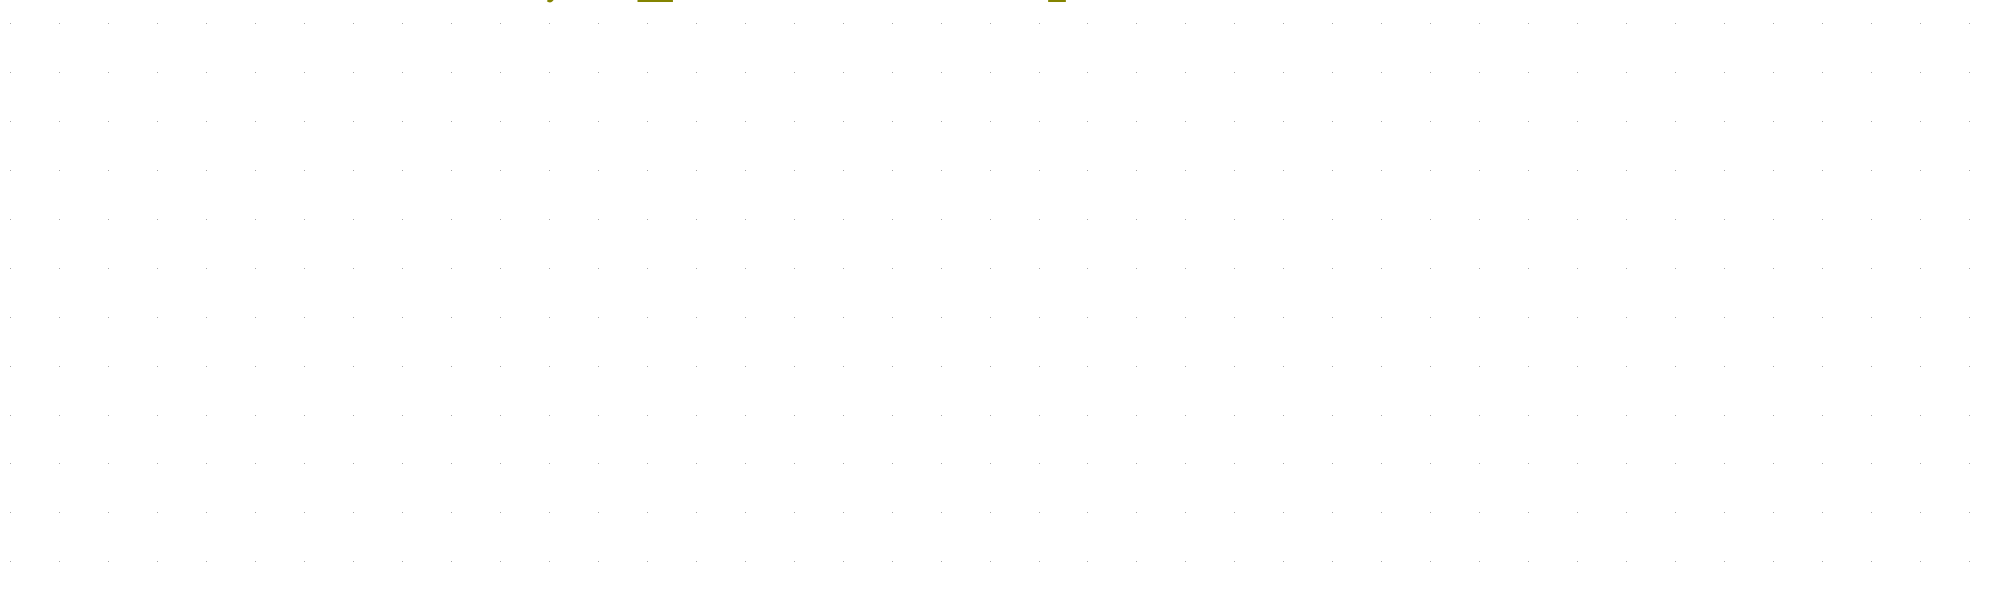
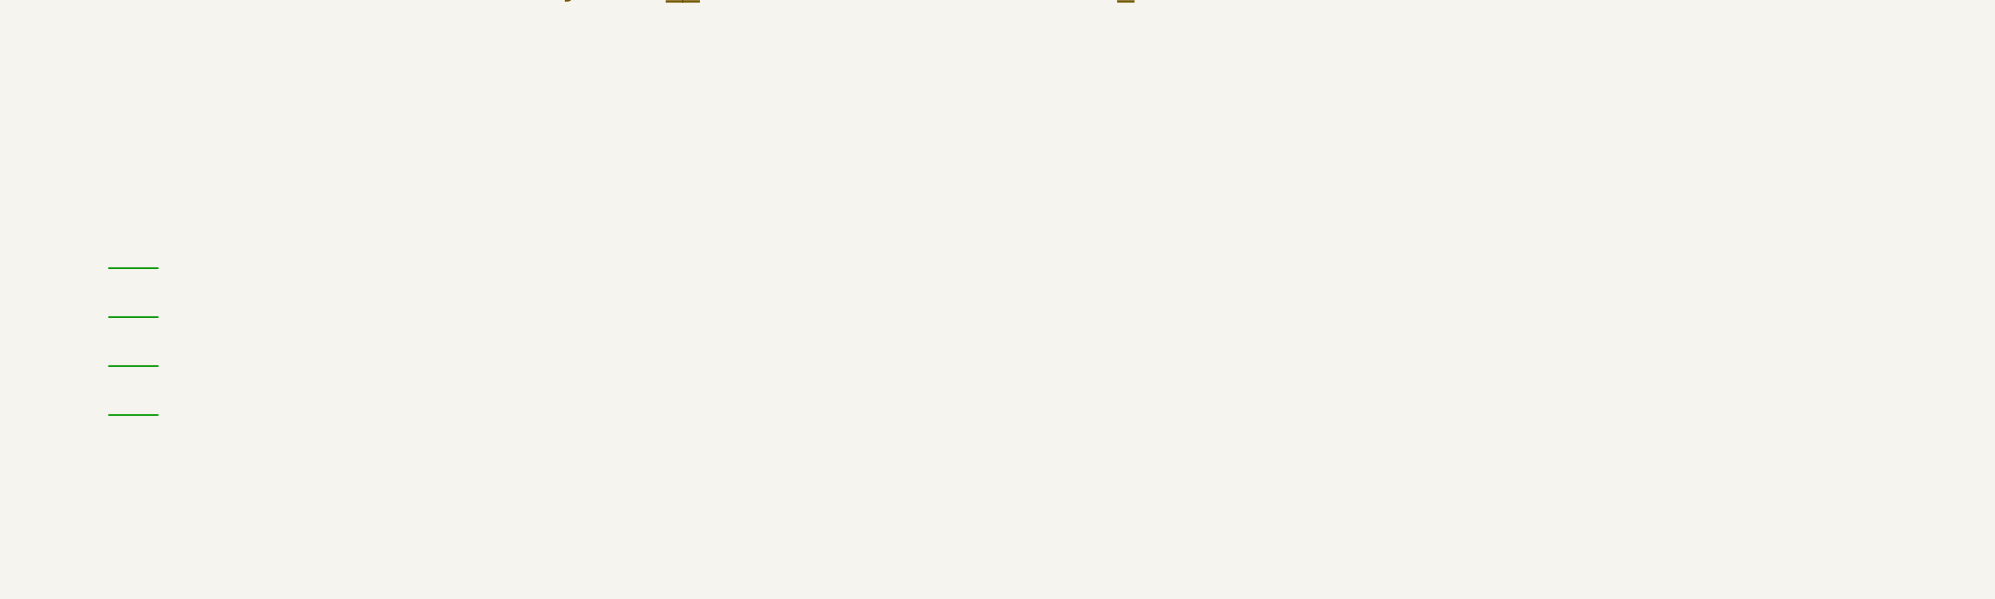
wire: none -> (108, 268) (157, 268)
wire: none -> (108, 317) (157, 317)
wire: none -> (108, 366) (157, 366)
wire: none -> (108, 415) (157, 415)

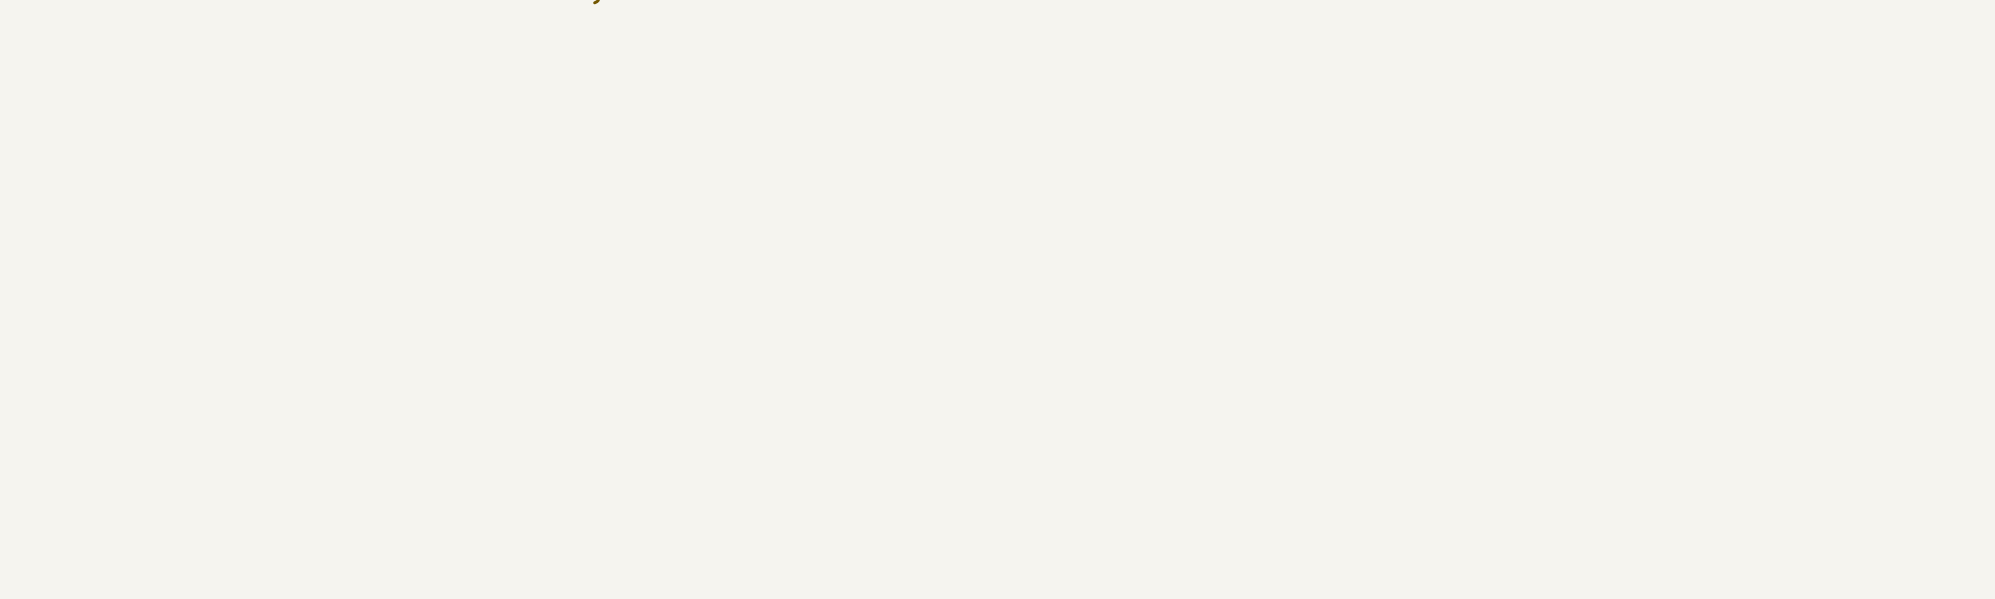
wire: (108, 268) (157, 268) -> none
wire: (108, 317) (157, 317) -> none
wire: (108, 366) (157, 366) -> none
wire: (108, 415) (157, 415) -> none

